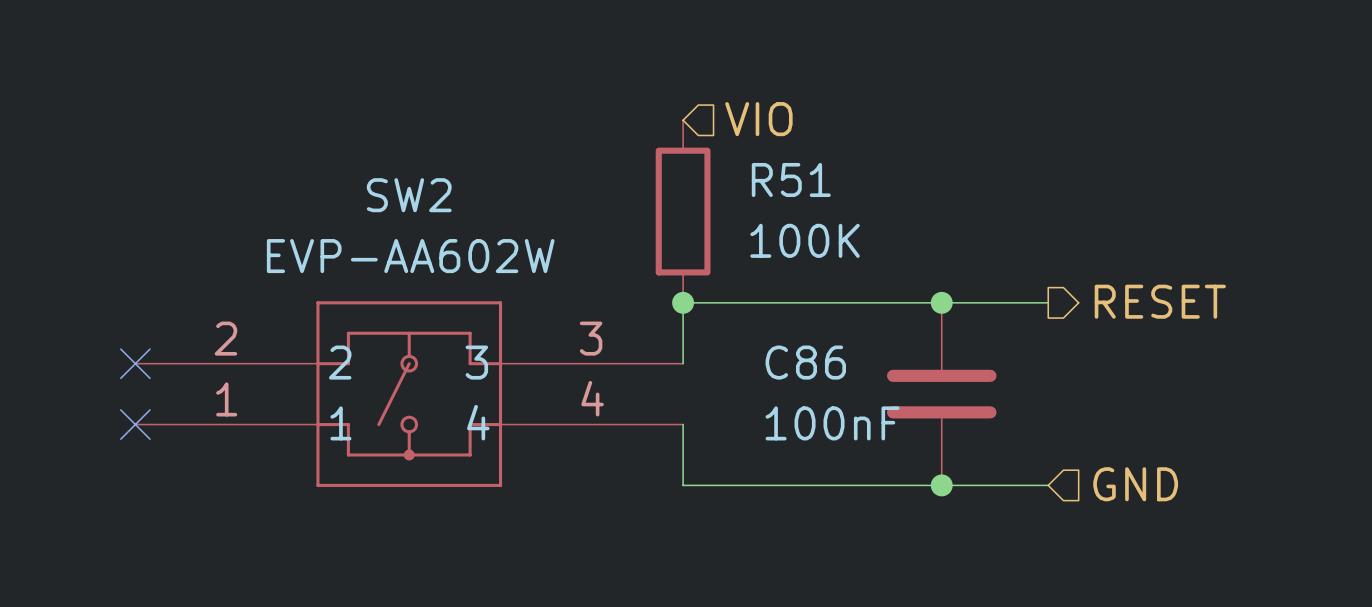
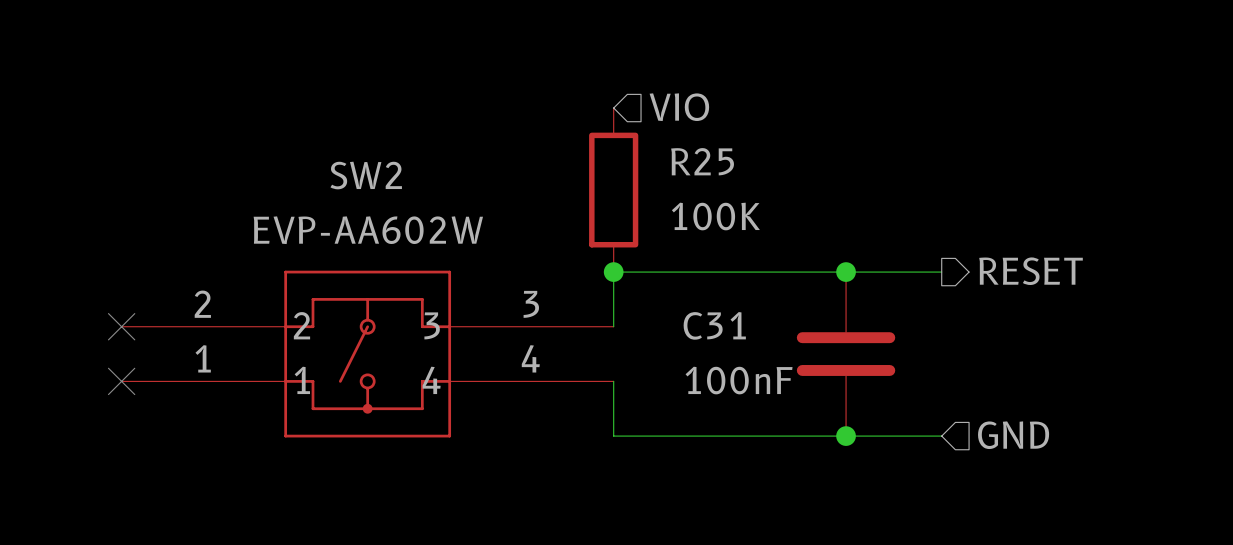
R51 name: R51 (791, 179) -> R25 (702, 161)
C86 name: C86 (805, 362) -> C31 (714, 325)

